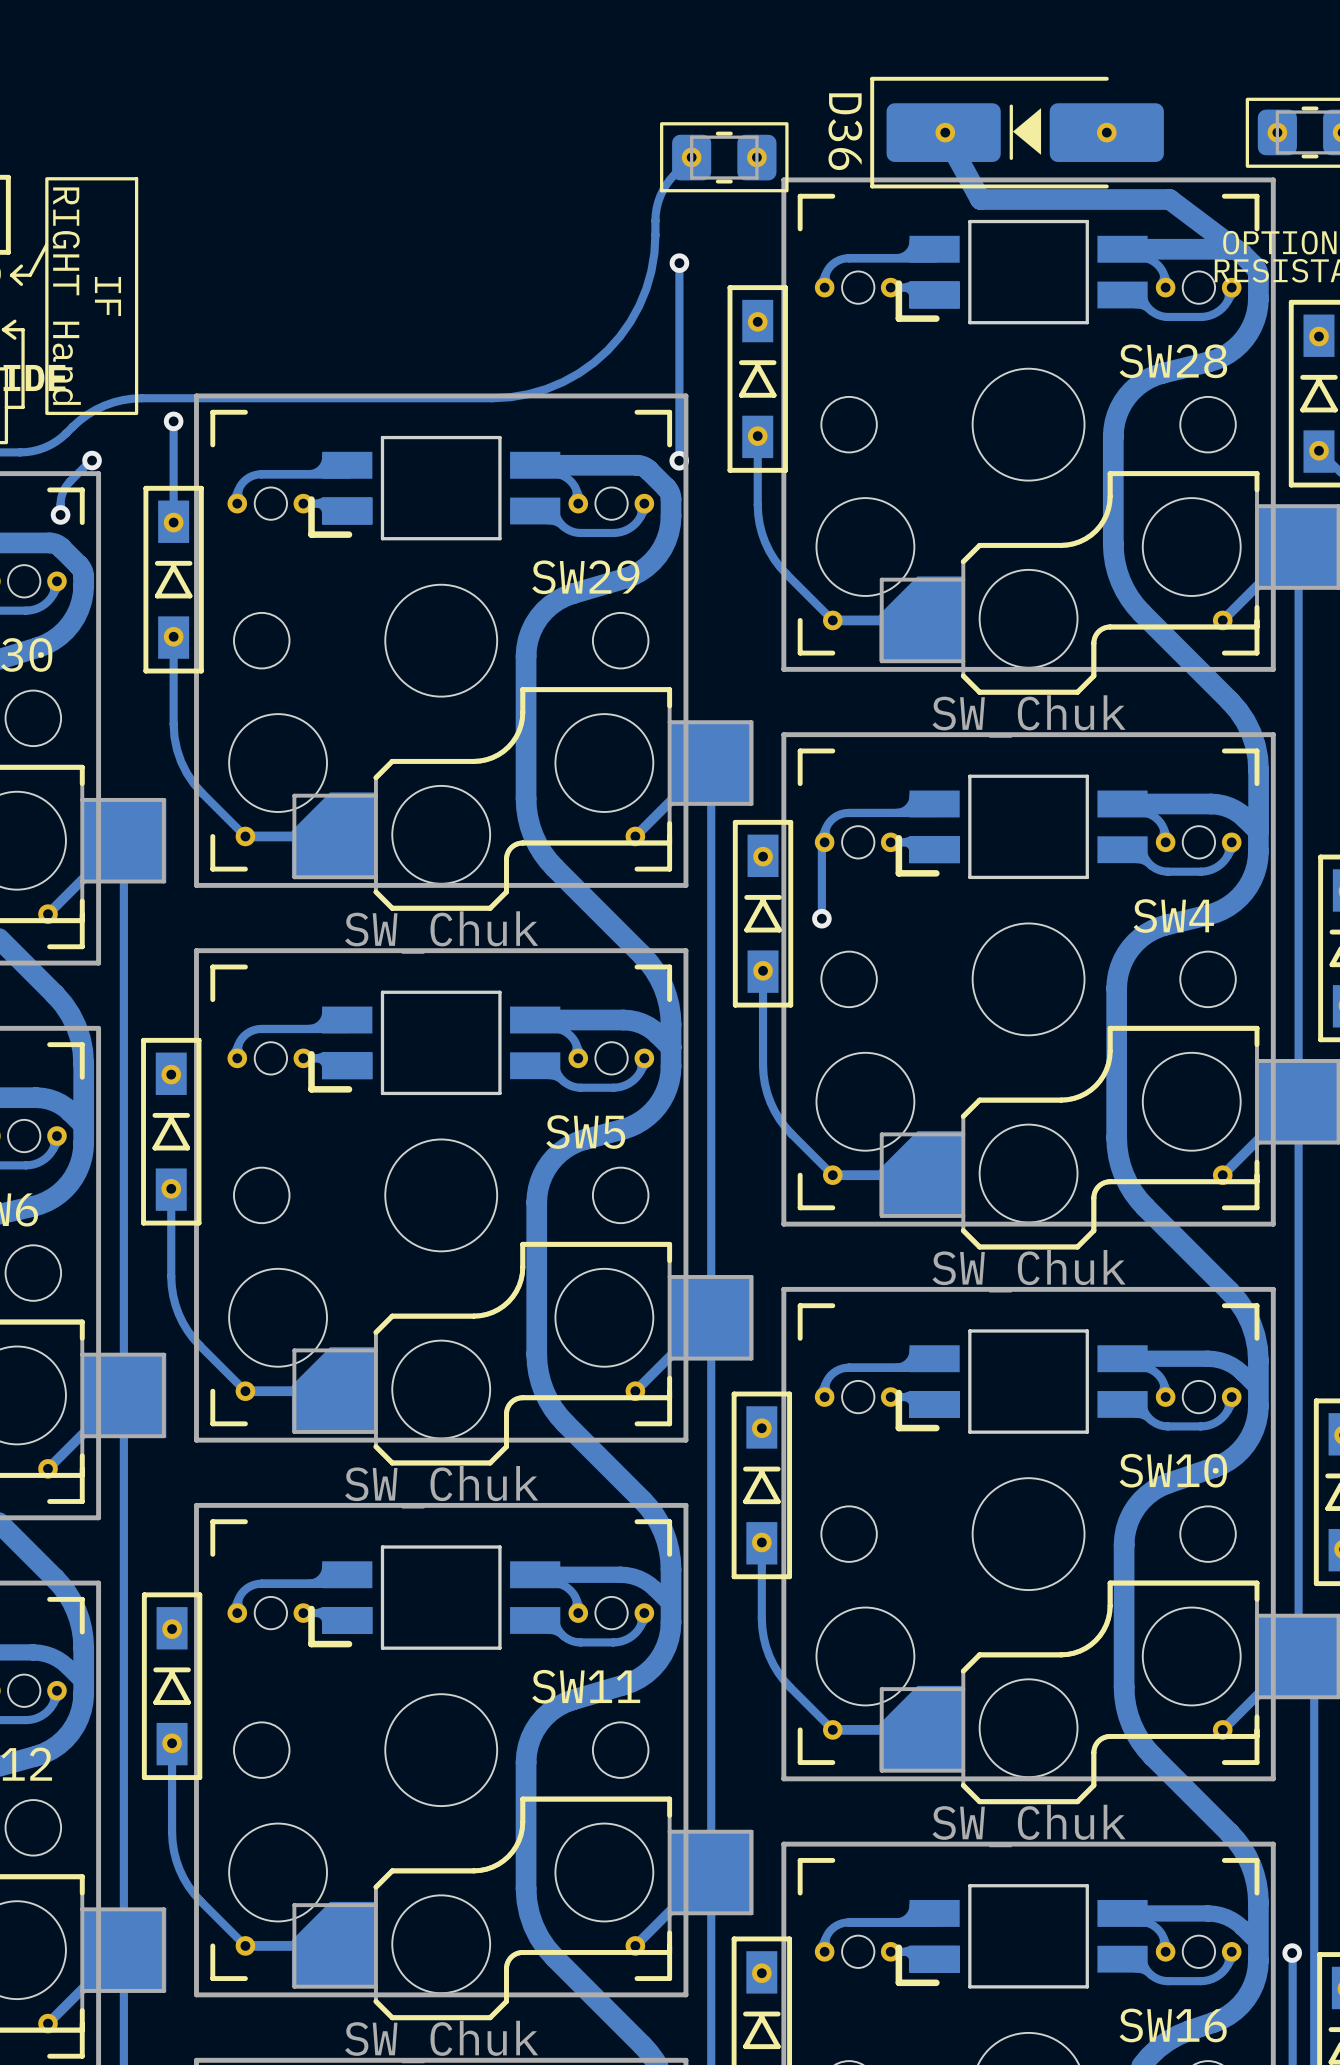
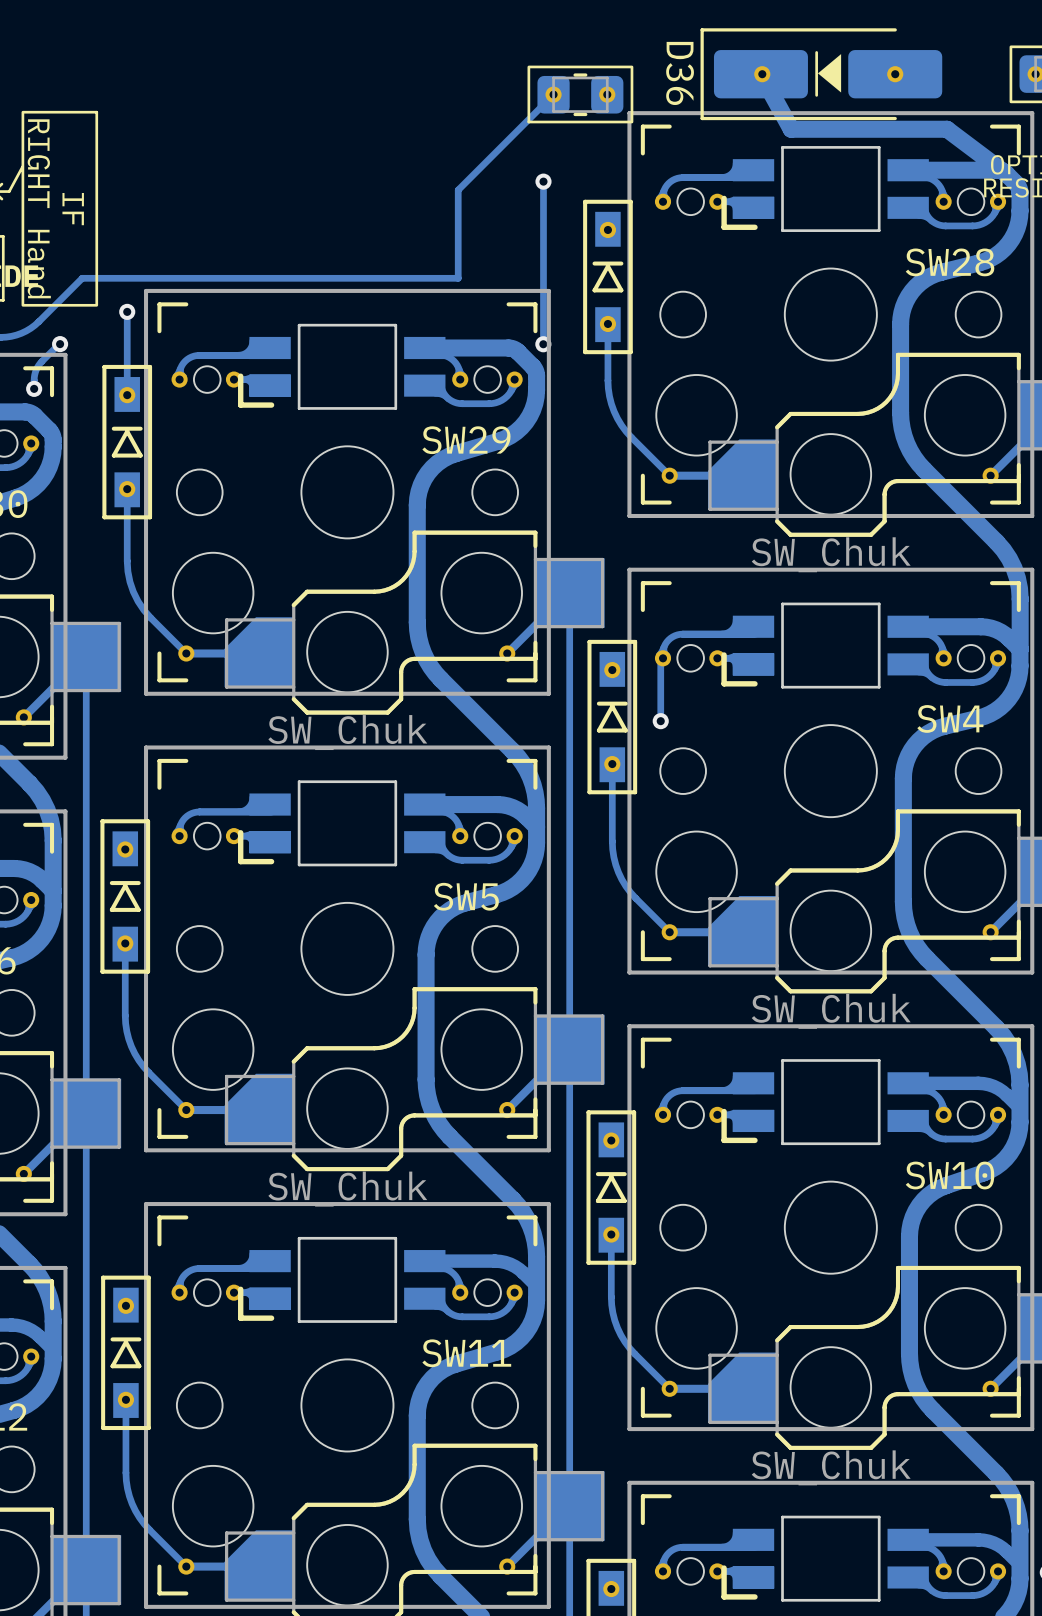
track: (674, 174) (666, 184) (658, 201) (651, 271) (639, 305) (619, 336) (607, 350) (579, 373) (563, 382) (528, 394) (492, 398) (132, 398) (113, 402) (95, 409) (72, 426) -> (539, 108) (458, 190) (458, 278) (82, 278) (44, 316)

